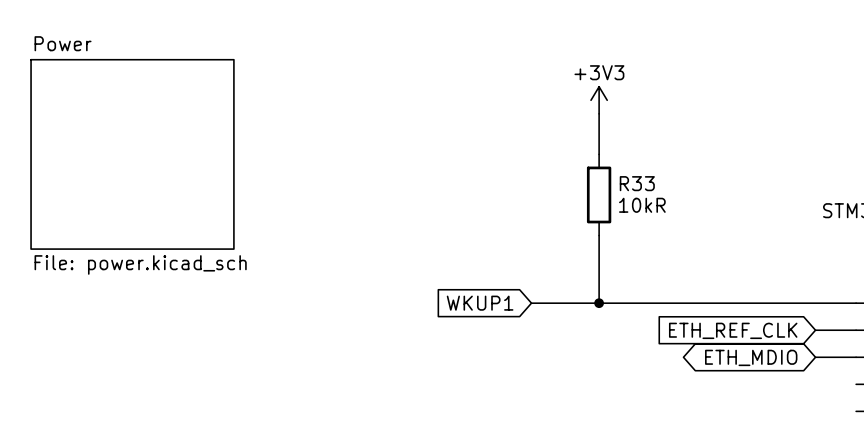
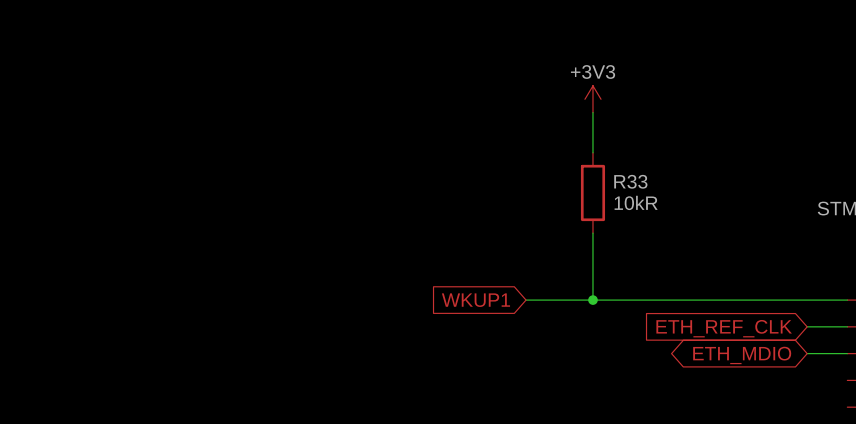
sheet Power: File: power.kicad_sch (132, 154) -> none

